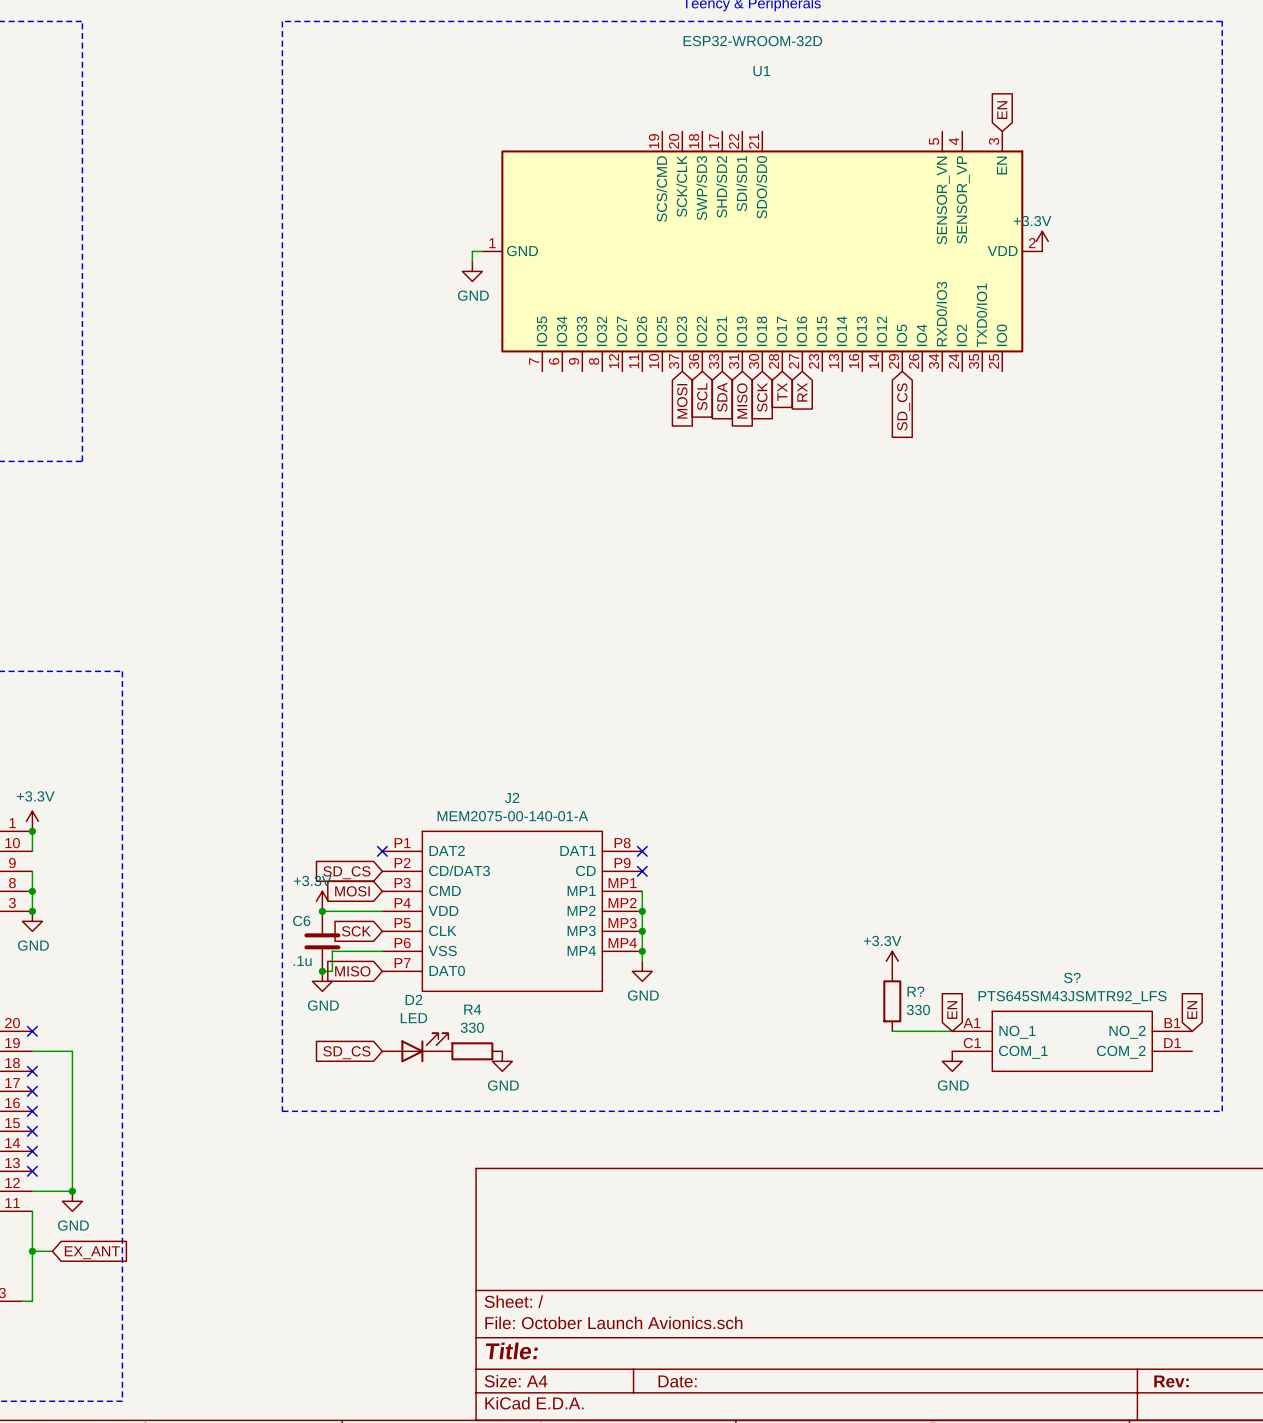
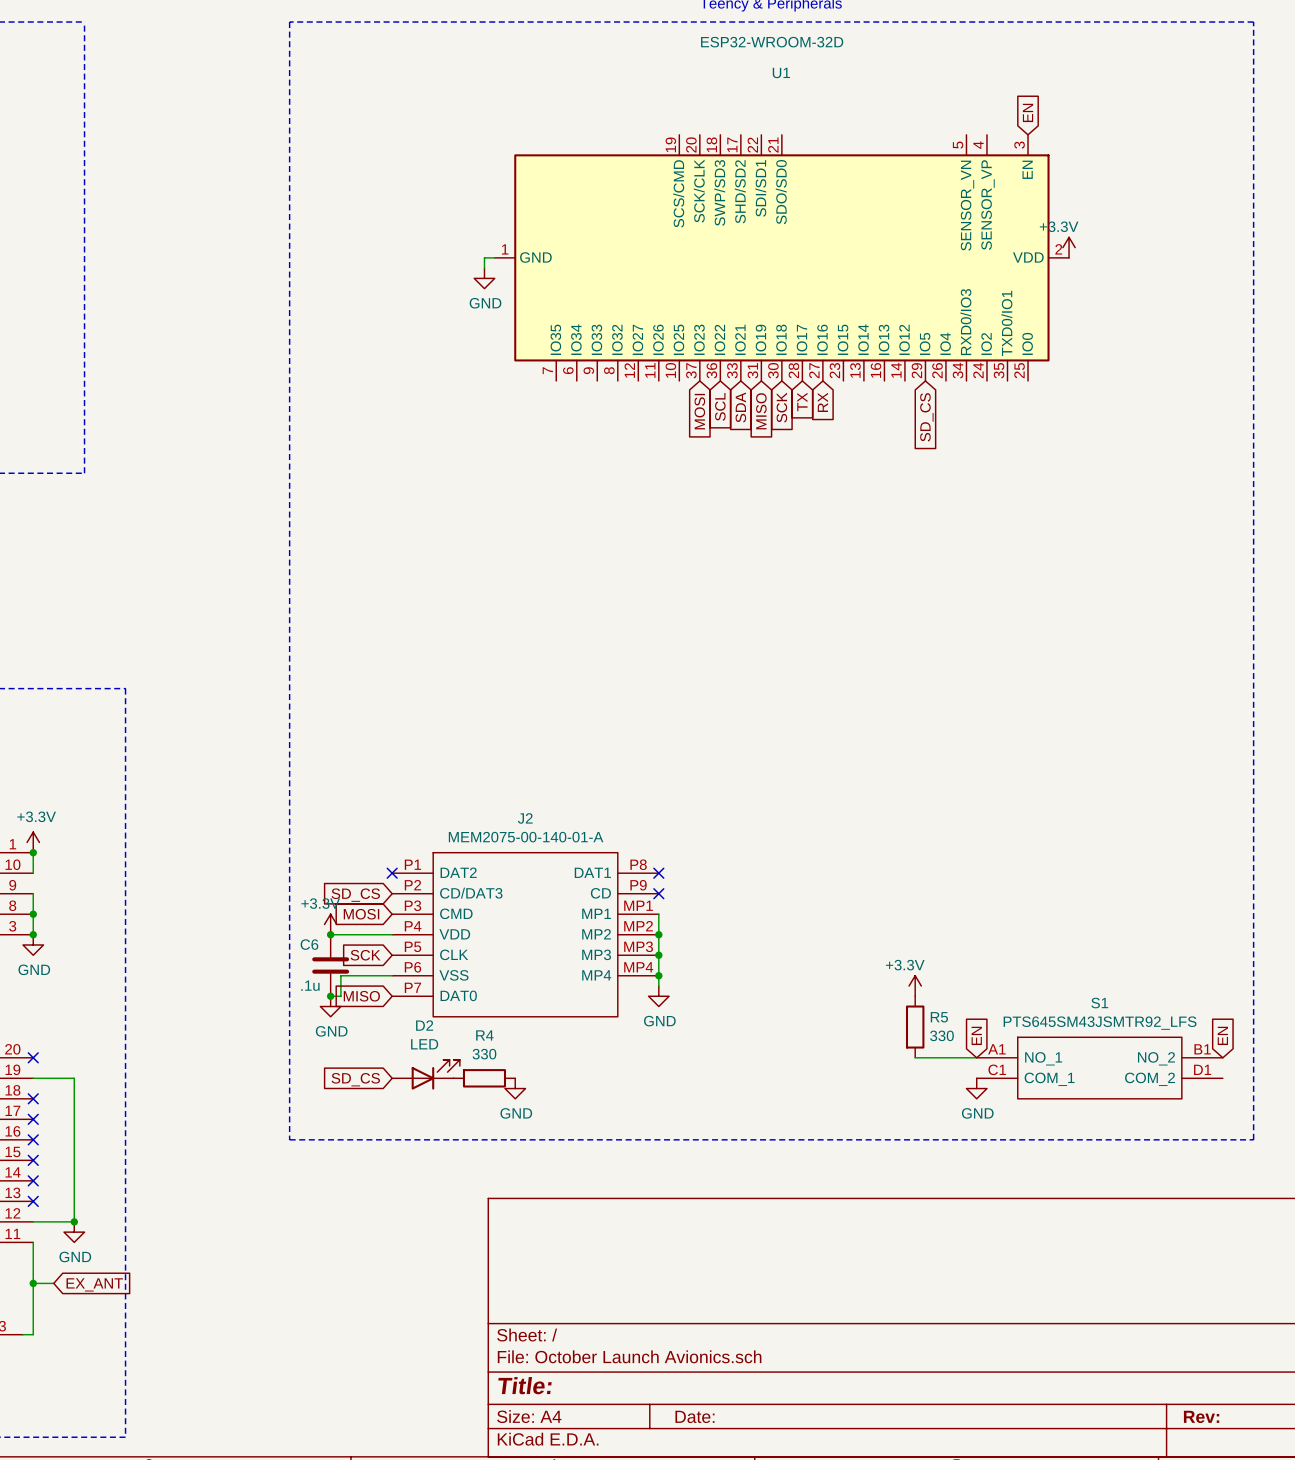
S? name: S? (1072, 977) -> S1 (1099, 1003)
R? name: R? (915, 991) -> R5 (939, 1017)

